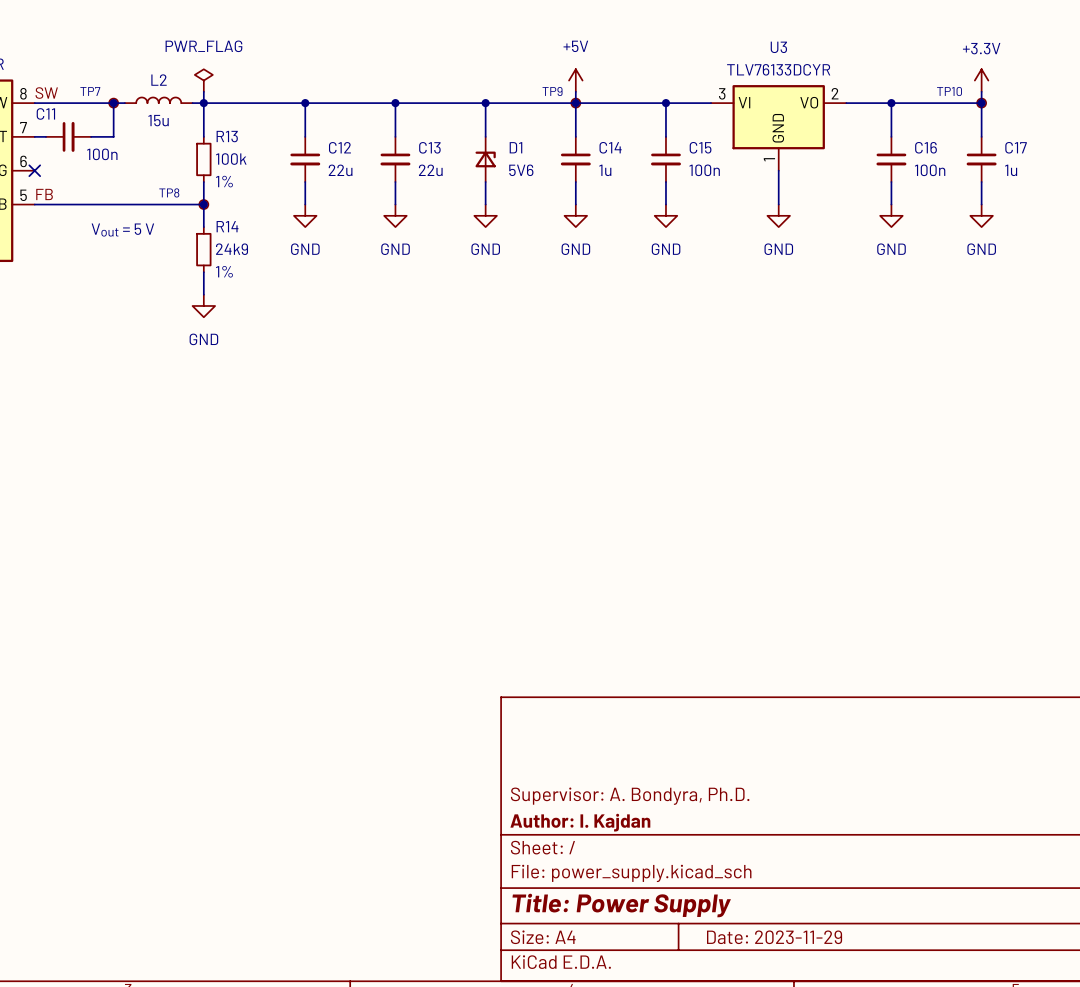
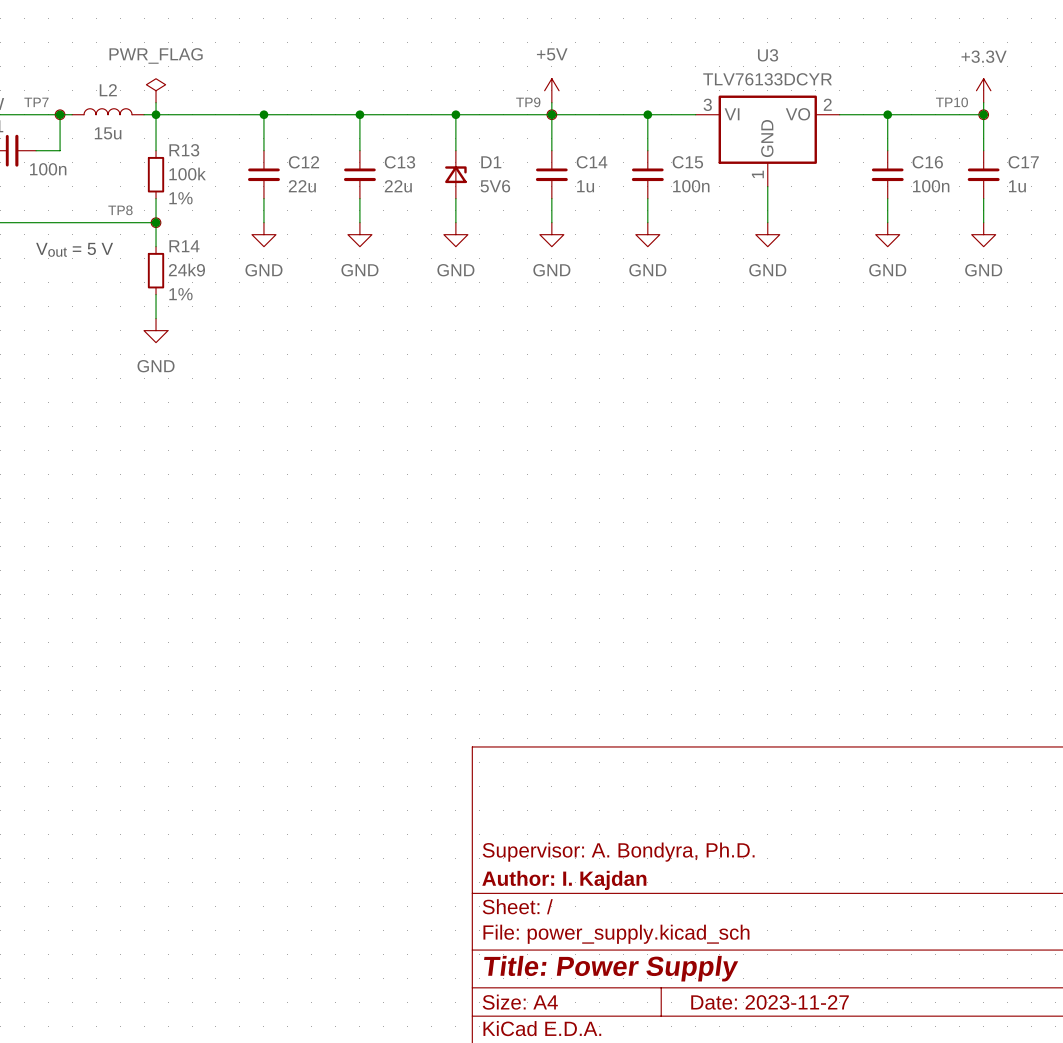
title block: Date: 2023-11-29 (774, 937) -> Date: 2023-11-27 (770, 1002)

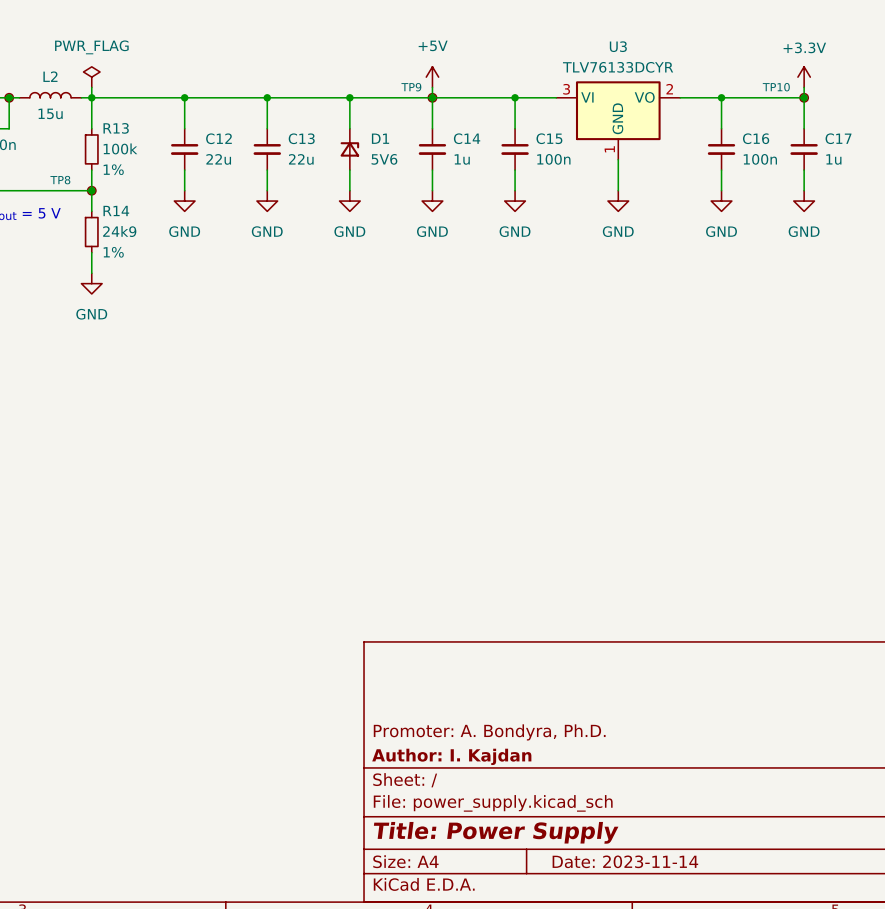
title block: Supervisor: A. Bondyra, Ph.D. (618, 852) -> Promoter: A. Bondyra, Ph.D. (489, 732)
title block: Date: 2023-11-27 (770, 1002) -> Date: 2023-11-14 (625, 861)

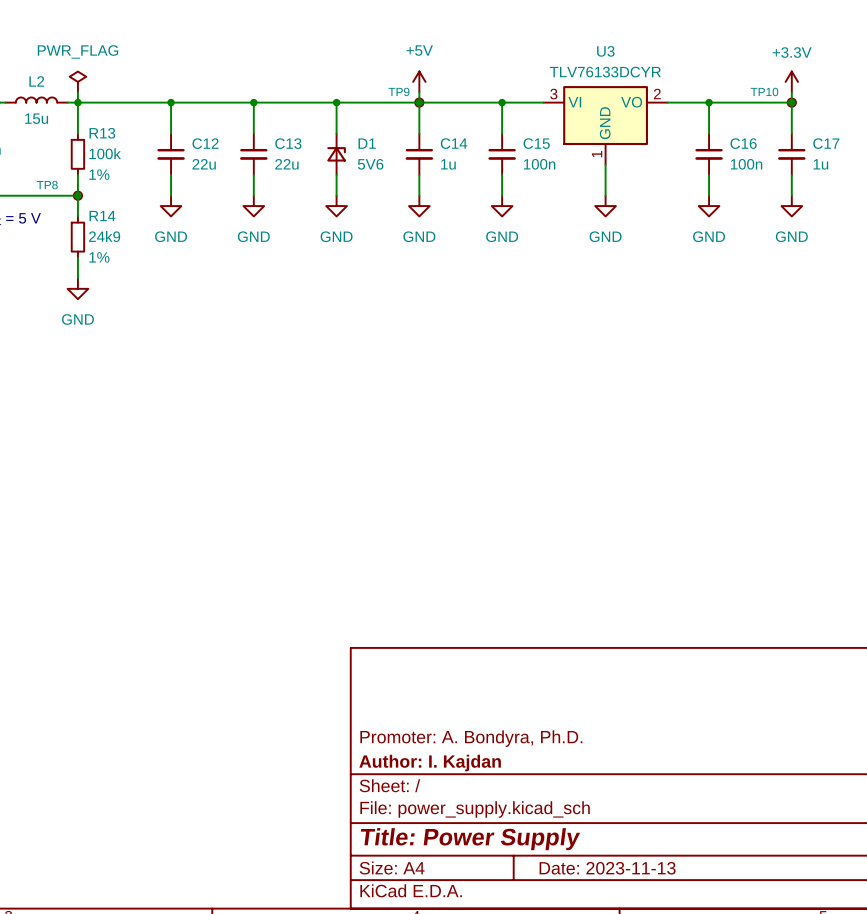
title block: Date: 2023-11-14 (625, 861) -> Date: 2023-11-13 (607, 868)

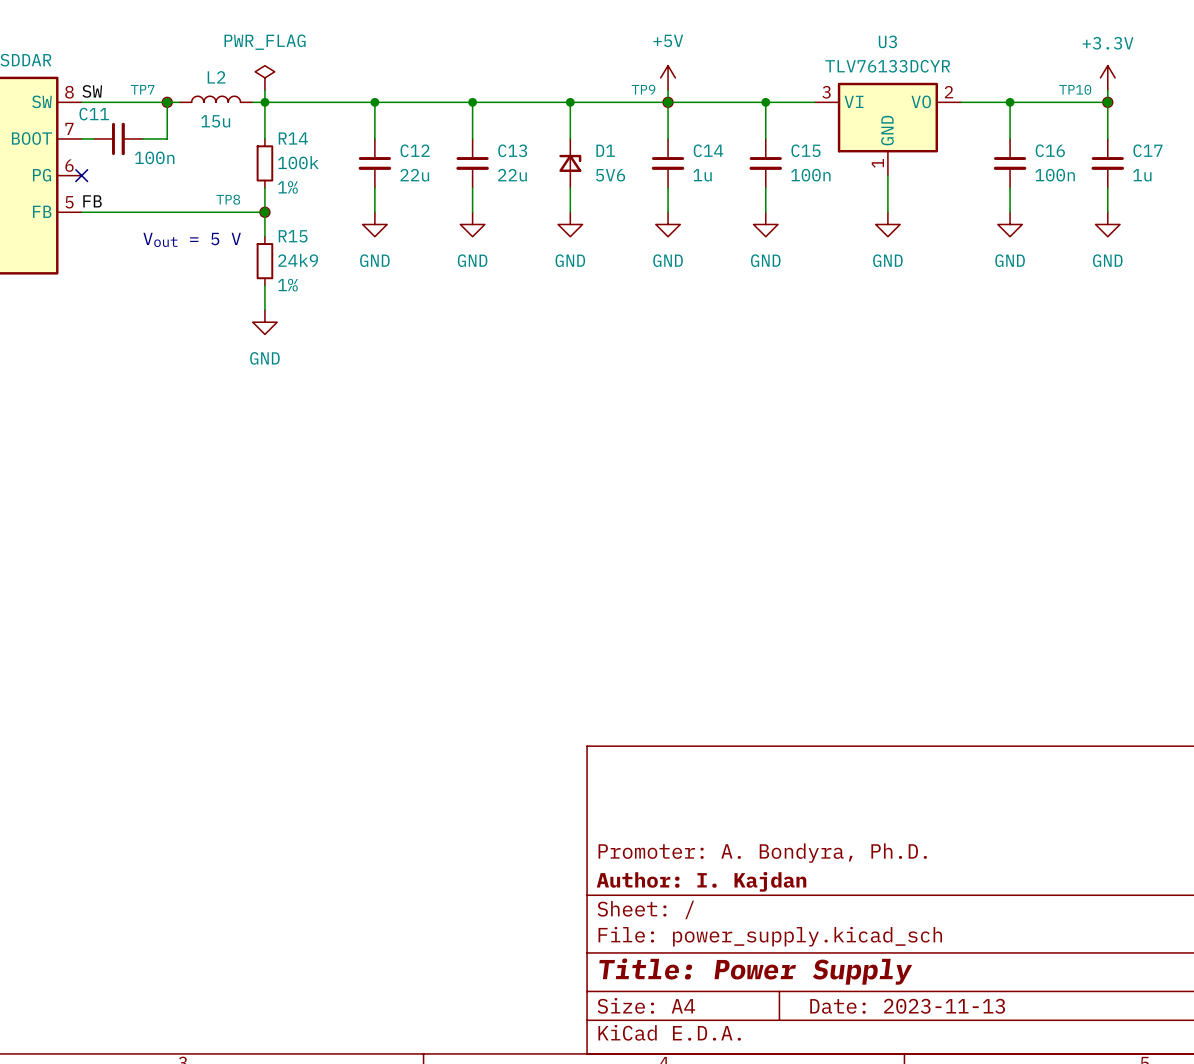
R13 name: R13 (102, 133) -> R14 (293, 138)
R14 name: R14 (102, 216) -> R15 (293, 236)

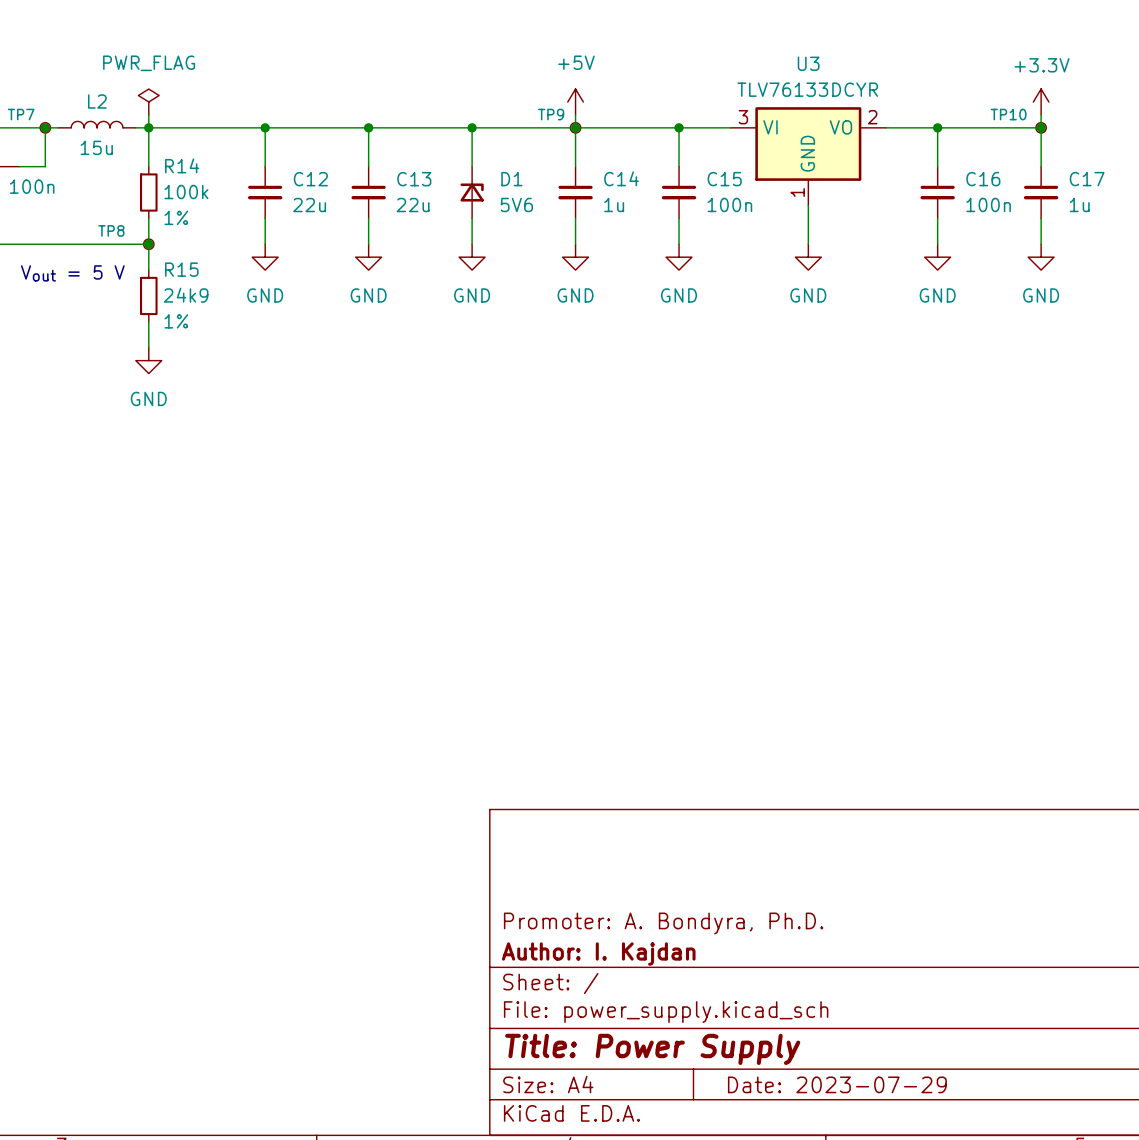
title block: Date: 2023-11-13 (907, 1006) -> Date: 2023-07-29 (837, 1084)

